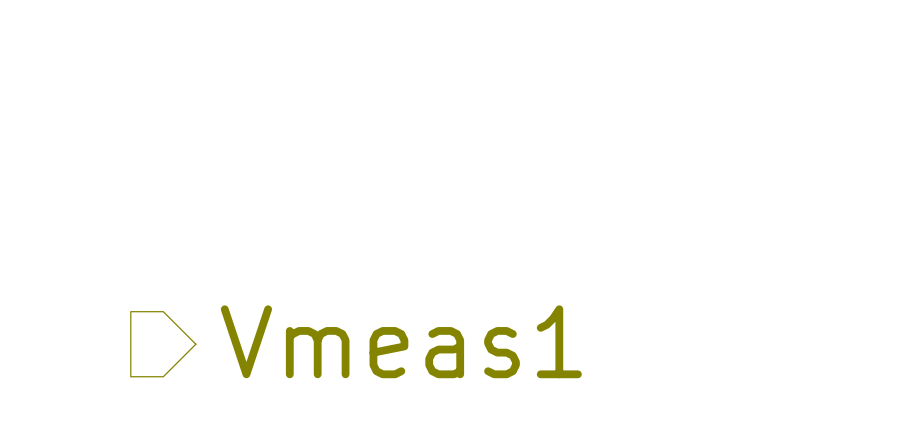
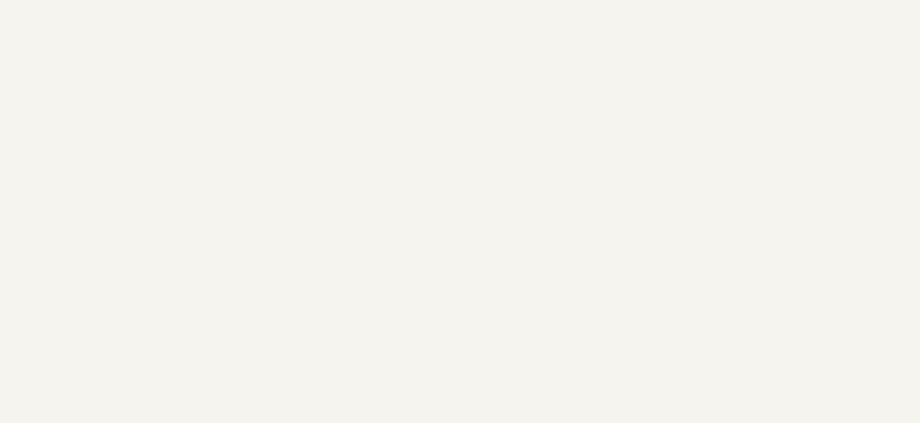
hierarchical label: Vmeas1 (401, 341) -> none

